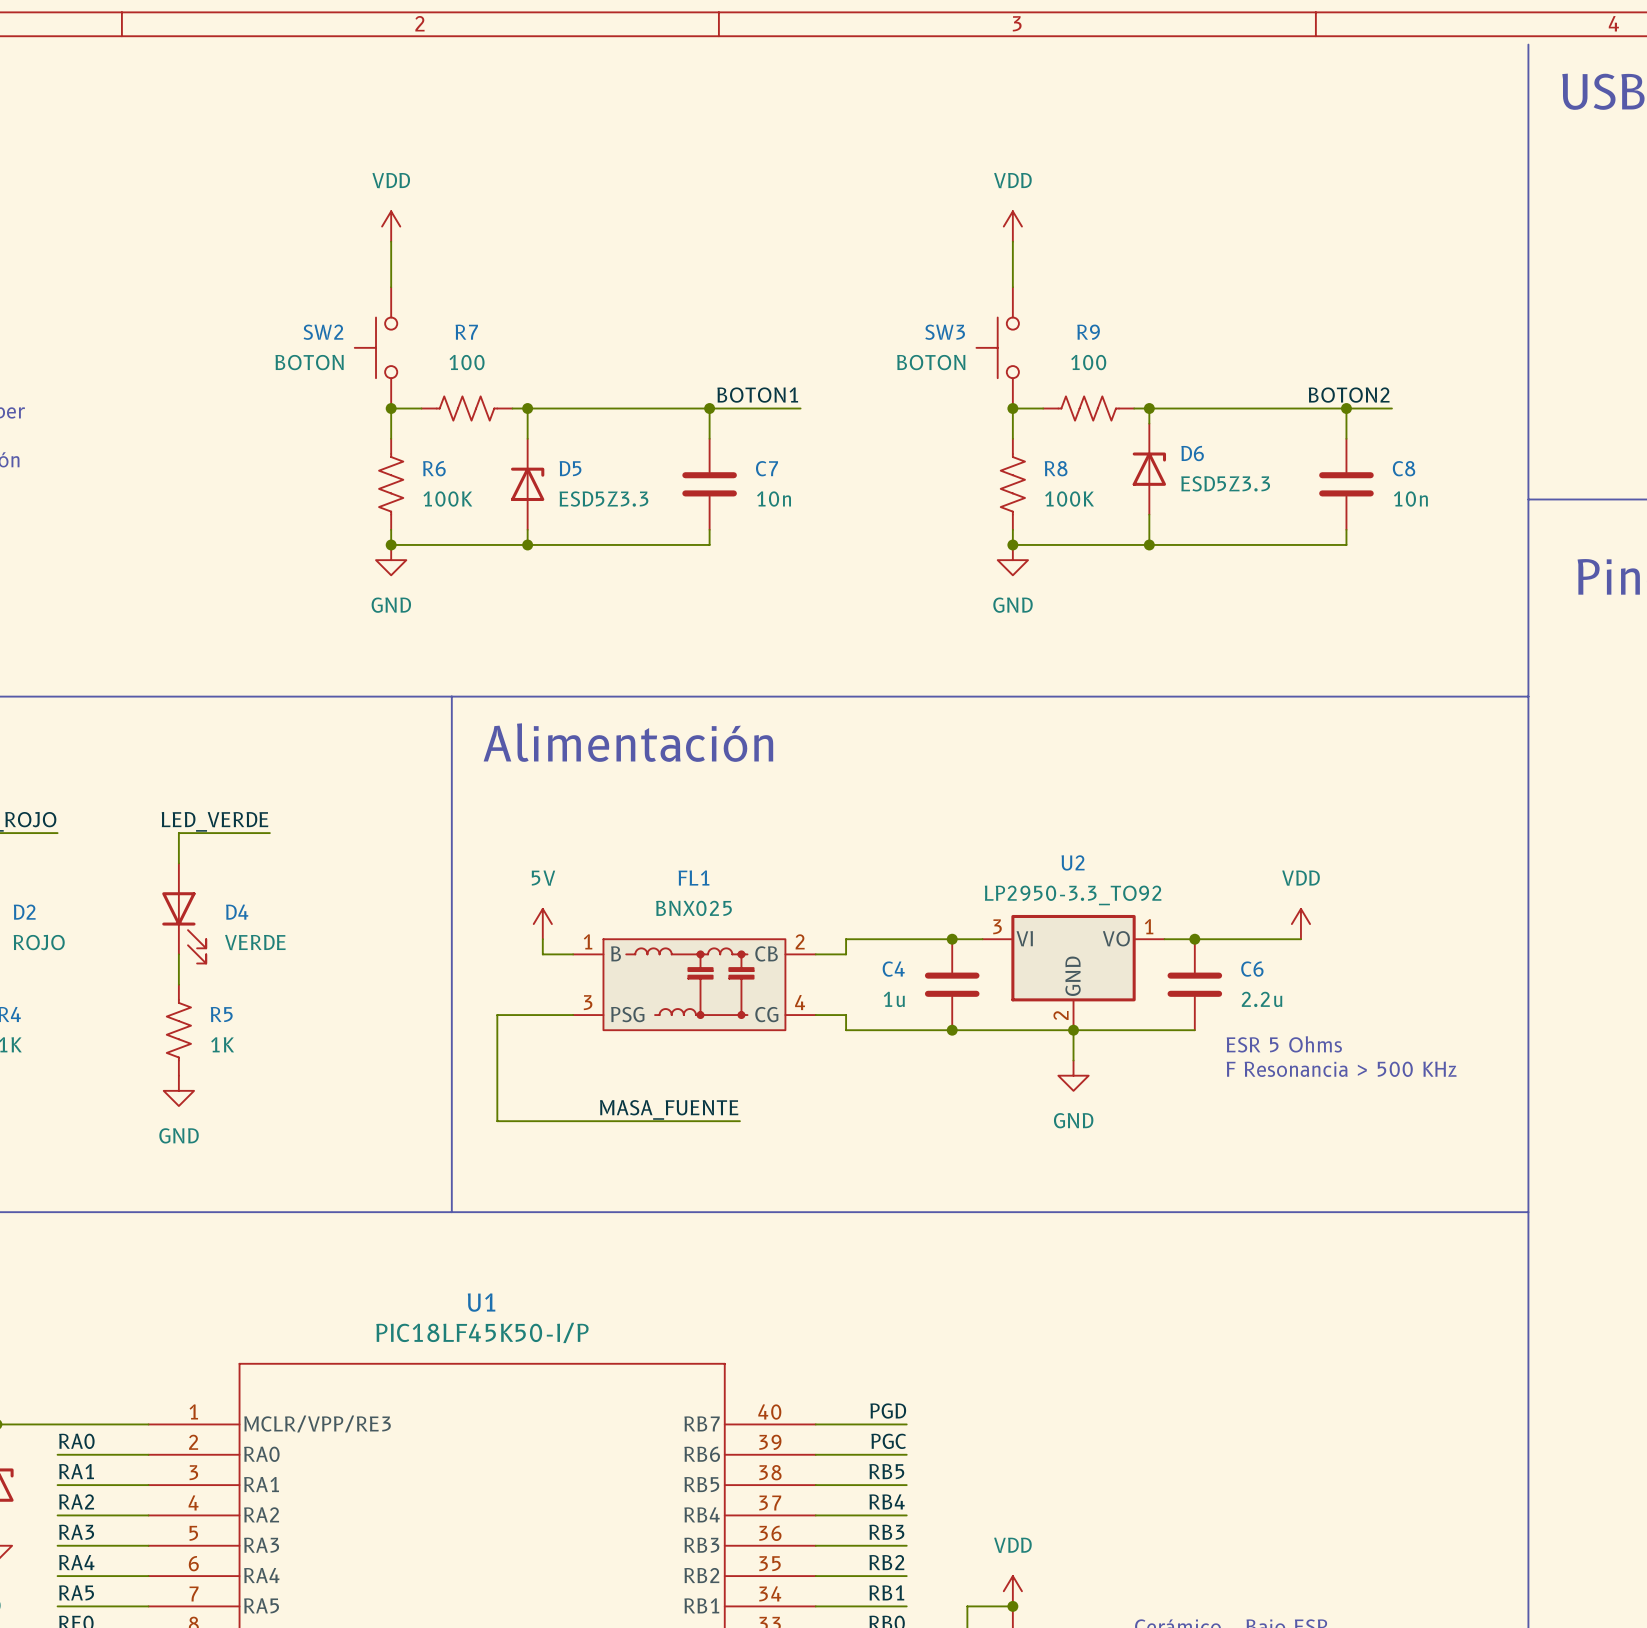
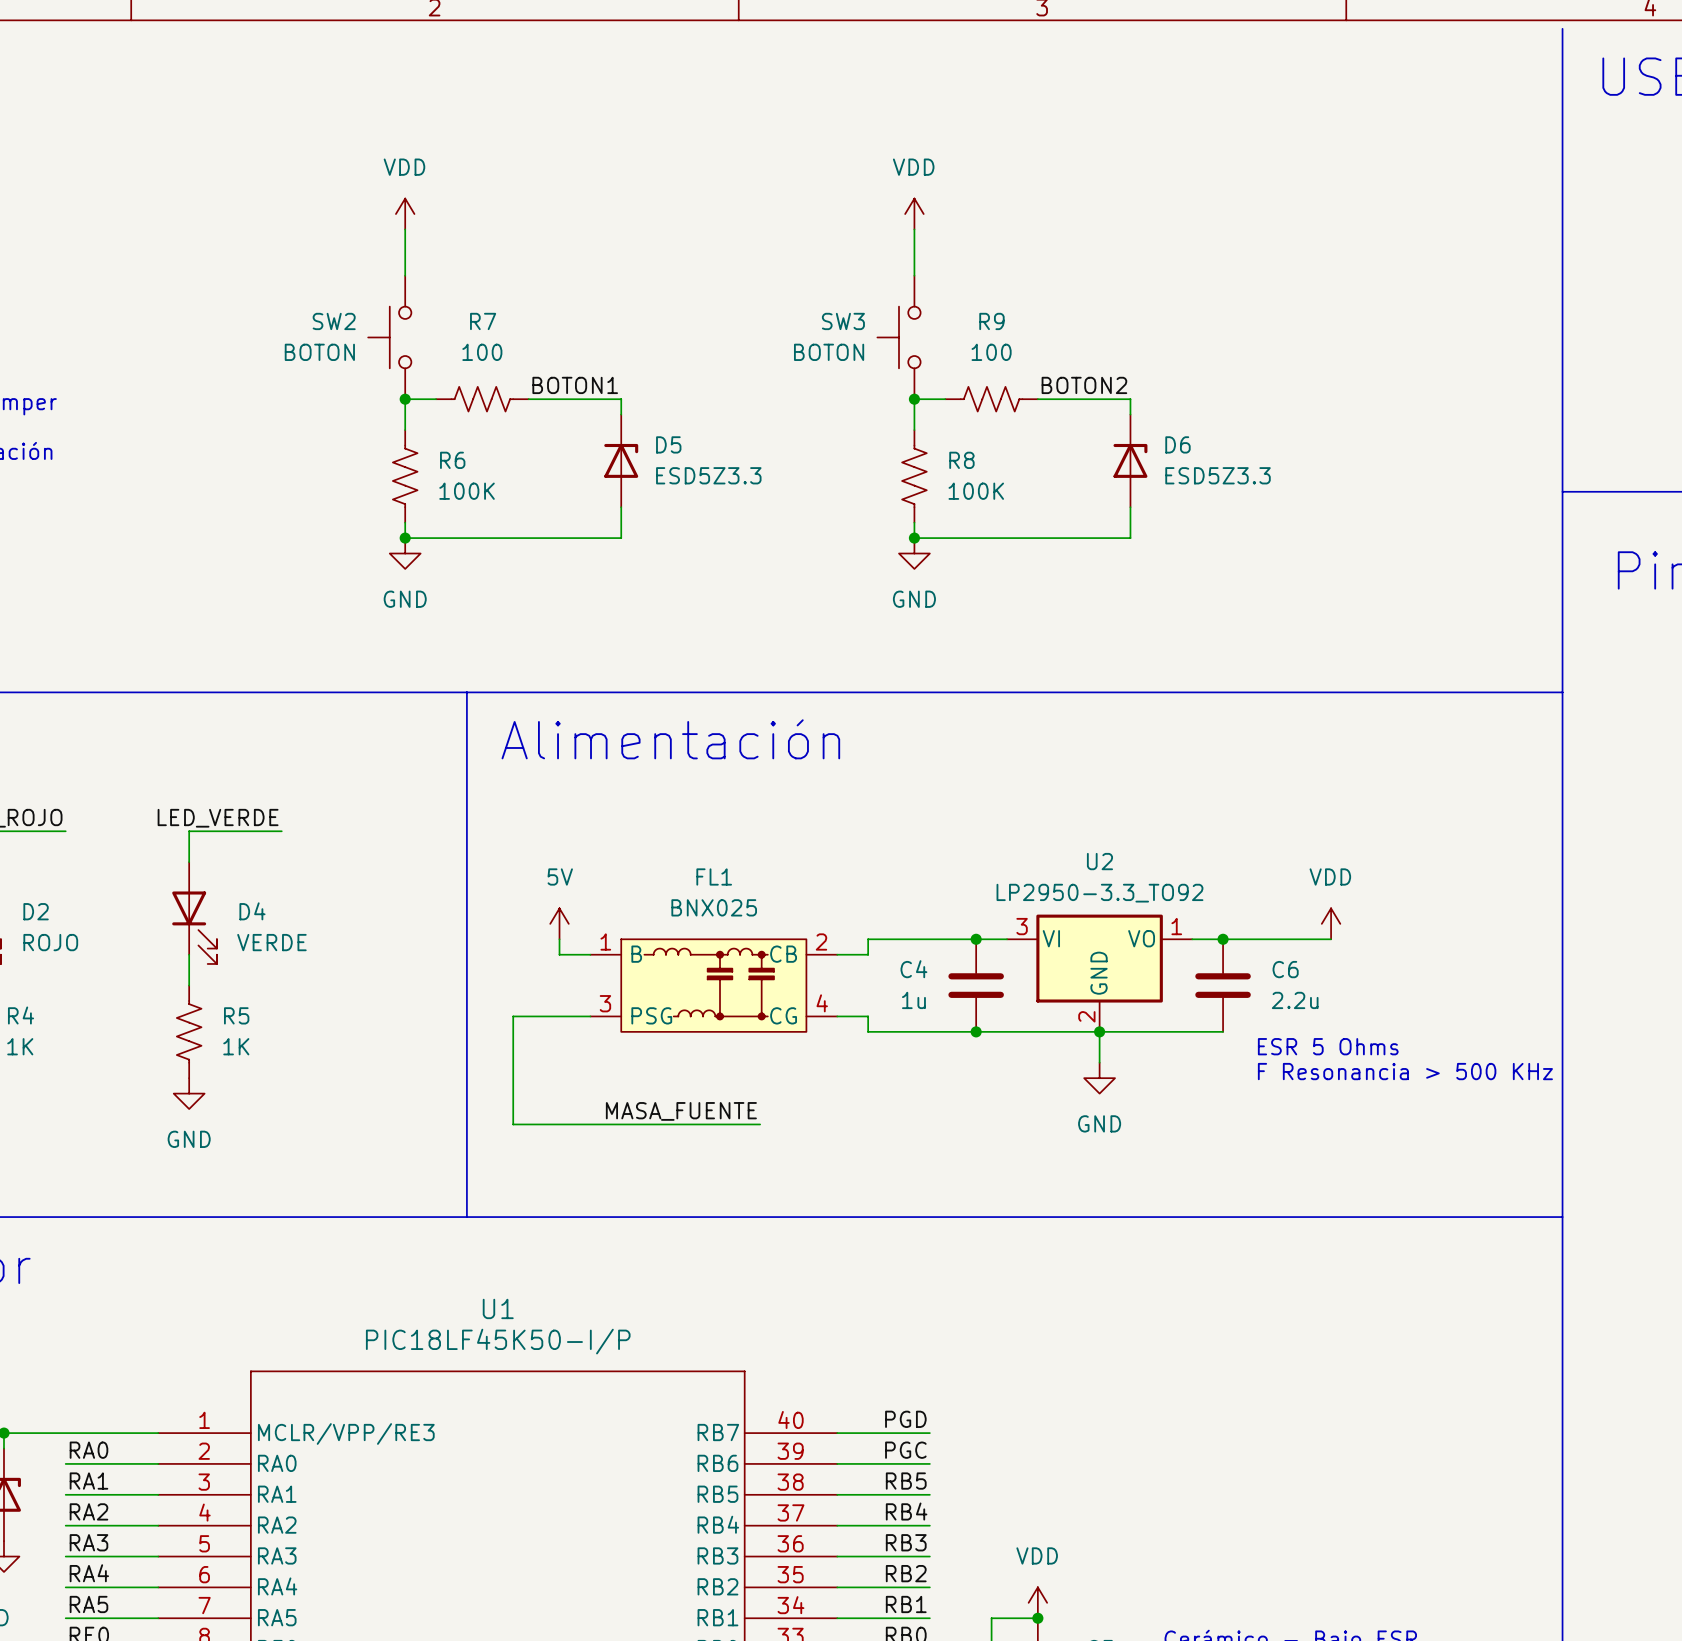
power symbol position: VDD (1012, 226) -> VDD (914, 214)
wire: (1012, 241) (1012, 287) -> (914, 229) (914, 275)
SW3 position: (997, 347) -> (899, 337)
label position: BOTON1 (757, 395) -> BOTON1 (575, 385)
label position: BOTON2 (1349, 395) -> BOTON2 (1084, 385)
wire: (527, 408) (527, 438) -> none
junction: (527, 408) -> none
wire: (603, 408) (800, 408) -> (621, 399) (621, 414)
wire: (709, 408) (709, 438) -> none
junction: (709, 408) -> none
junction: none -> (914, 399)
wire: none -> (945, 399) (914, 399) (914, 430)
wire: (1012, 408) (1012, 438) -> none
junction: (1012, 408) -> none
wire: none -> (1068, 399) (1130, 399) (1130, 414)
R9 position: (1088, 408) -> (991, 399)
wire: (1134, 408) (1391, 408) -> none
wire: (1149, 408) (1149, 423) -> none
junction: (1149, 408) -> none
wire: (1346, 408) (1346, 438) -> none
junction: (1346, 408) -> none
D6 position: (1149, 469) -> (1130, 460)
D5 position: (527, 484) -> (621, 460)
C7: 10n (709, 484) -> none
R8 position: (1012, 484) -> (914, 476)
C8: 10n (1346, 484) -> none
wire: (1149, 514) (1149, 544) -> none
wire: (527, 529) (527, 544) -> none
wire: (709, 529) (709, 544) (603, 544) -> (621, 507) (621, 538)
wire: (1012, 529) (1012, 544) -> (914, 522) (914, 538) (1037, 538)
wire: (1346, 529) (1346, 544) (1103, 544) -> (1130, 507) (1130, 538)
junction: (527, 544) -> none
junction: none -> (914, 538)
junction: (1012, 544) -> none
junction: (1149, 544) -> none
power symbol position: GND (1012, 560) -> GND (914, 553)

